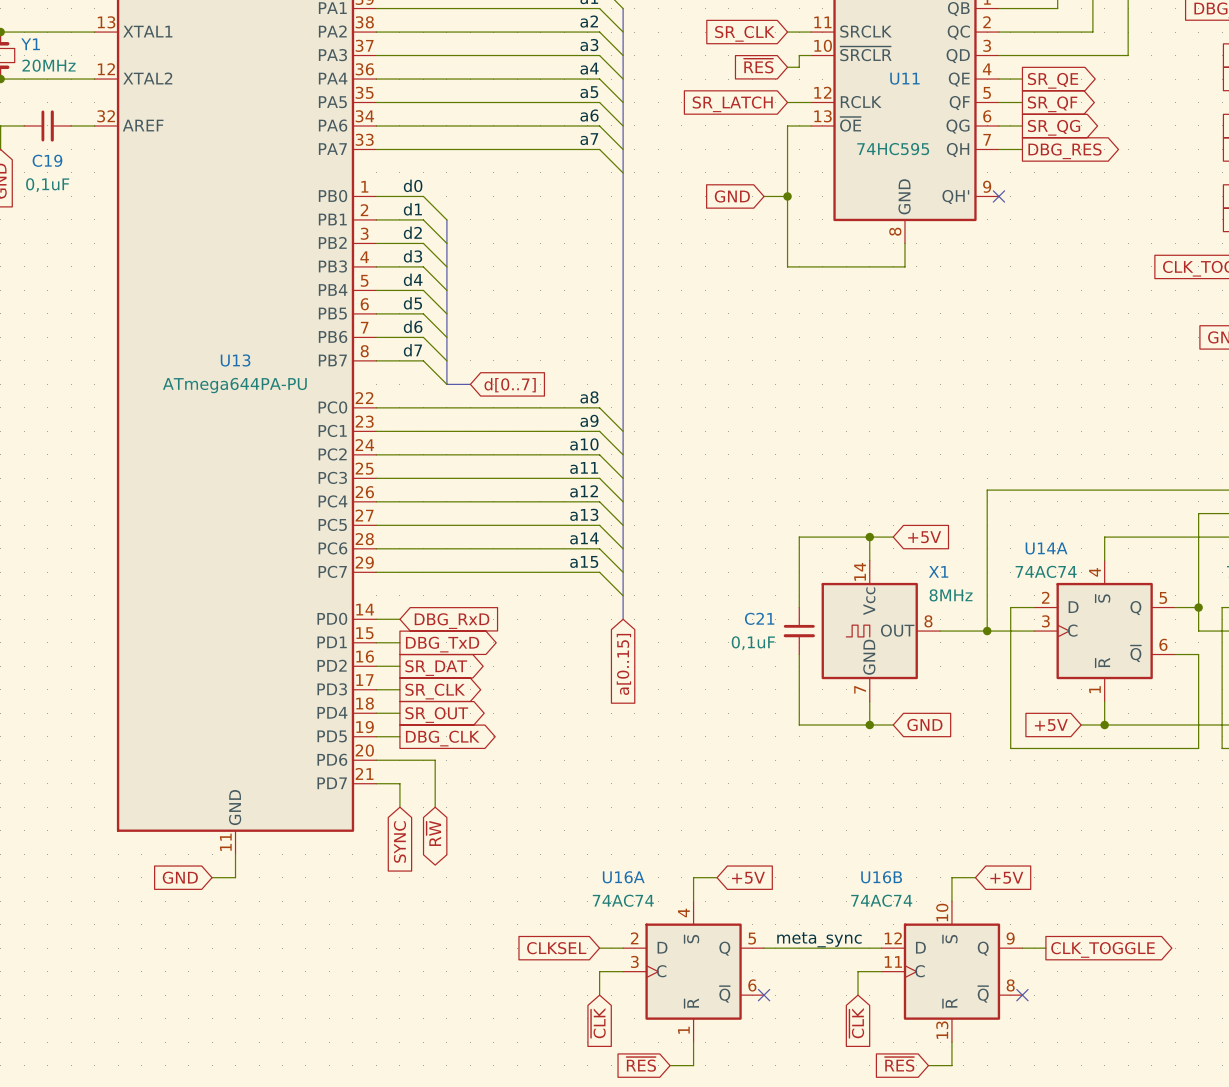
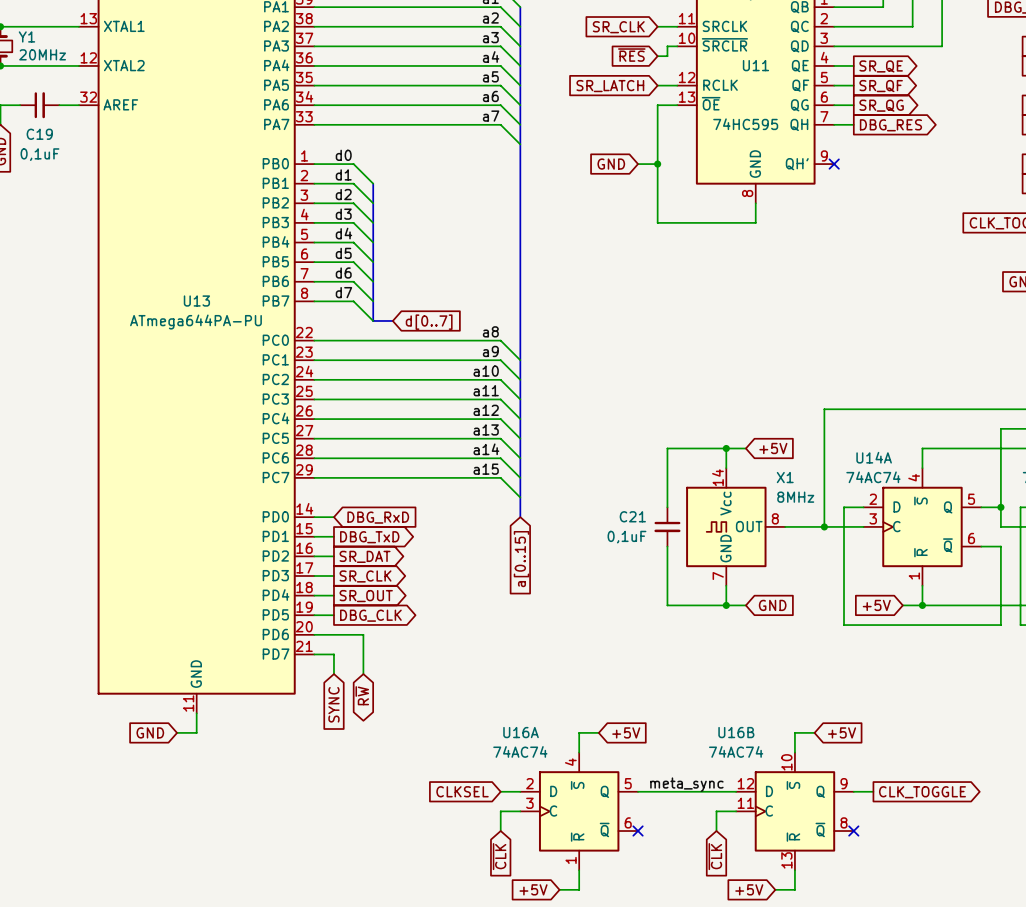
global label: ~{RES} (641, 1064) -> +5V (533, 889)
global label: ~{RES} (899, 1064) -> +5V (749, 889)

